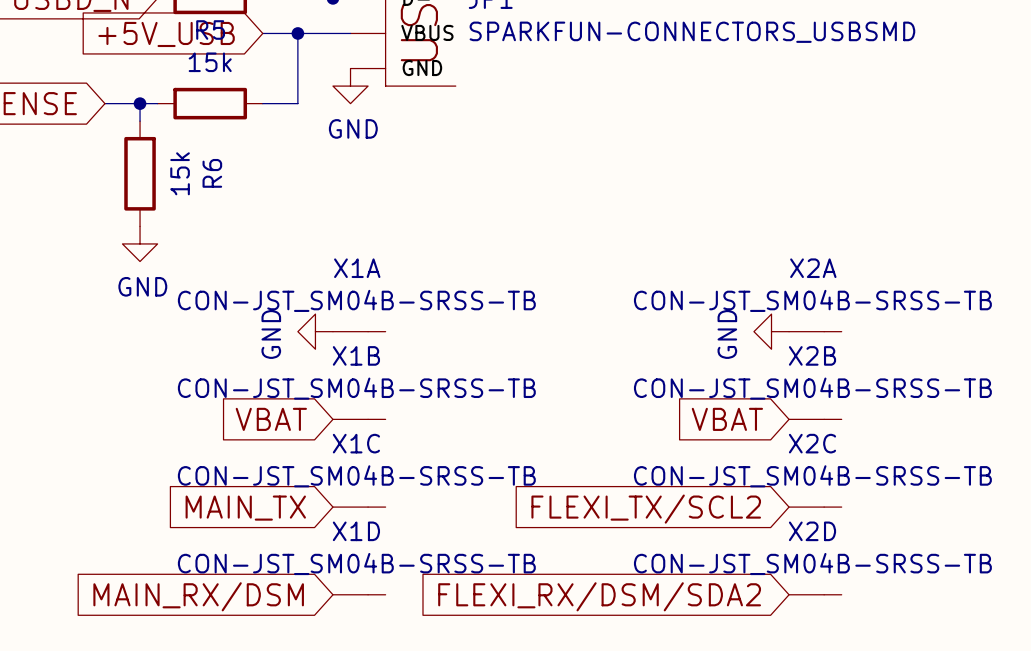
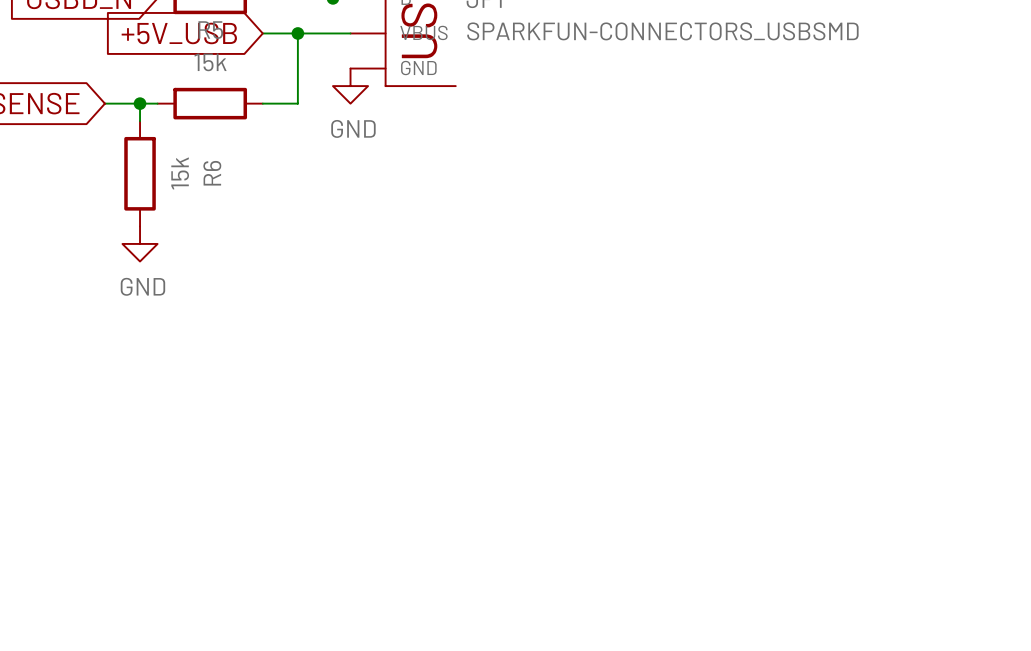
power symbol: GND (315, 331) -> none
X1A: CON-JST_SM04B-SRSS-TB (359, 331) -> none
power symbol: GND (771, 331) -> none
X2A: CON-JST_SM04B-SRSS-TB (815, 331) -> none
global label: VBAT (271, 419) -> none
X1B: CON-JST_SM04B-SRSS-TB (359, 419) -> none
global label: VBAT (727, 419) -> none
X2B: CON-JST_SM04B-SRSS-TB (815, 419) -> none
X1C: CON-JST_SM04B-SRSS-TB (359, 507) -> none
X2C: CON-JST_SM04B-SRSS-TB (815, 507) -> none
global label: MAIN_TX (245, 508) -> none
global label: FLEXI_TX/SCL2 (646, 509) -> none
X1D: CON-JST_SM04B-SRSS-TB (359, 594) -> none
X2D: CON-JST_SM04B-SRSS-TB (815, 594) -> none
global label: MAIN_RX/DSM (198, 596) -> none
global label: FLEXI_RX/DSM/SDA2 (599, 596) -> none

